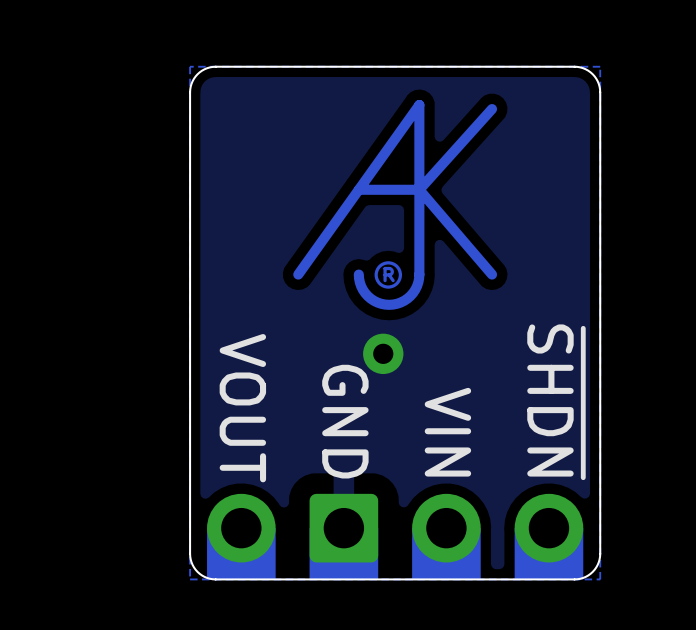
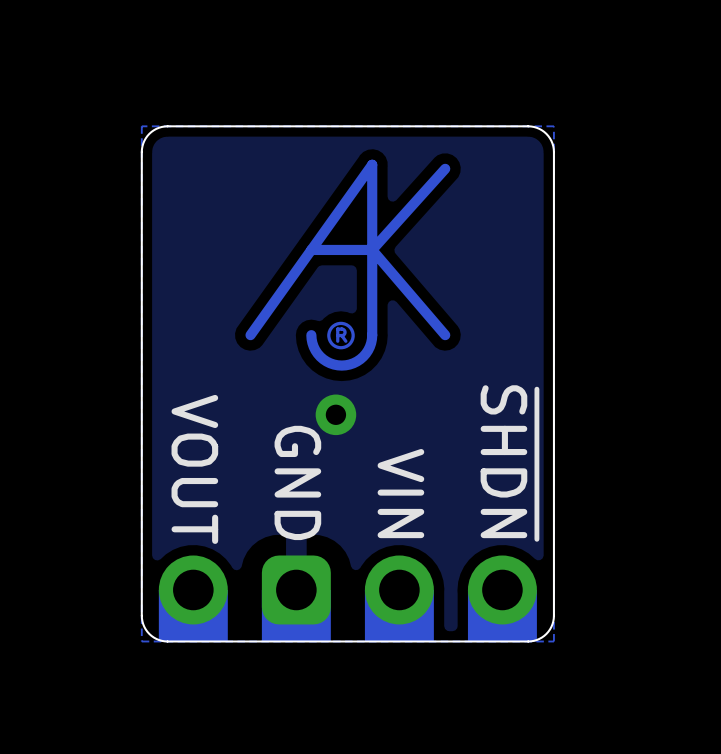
part footprint: [207, 493, 584, 580] -> [158, 555, 537, 642]

